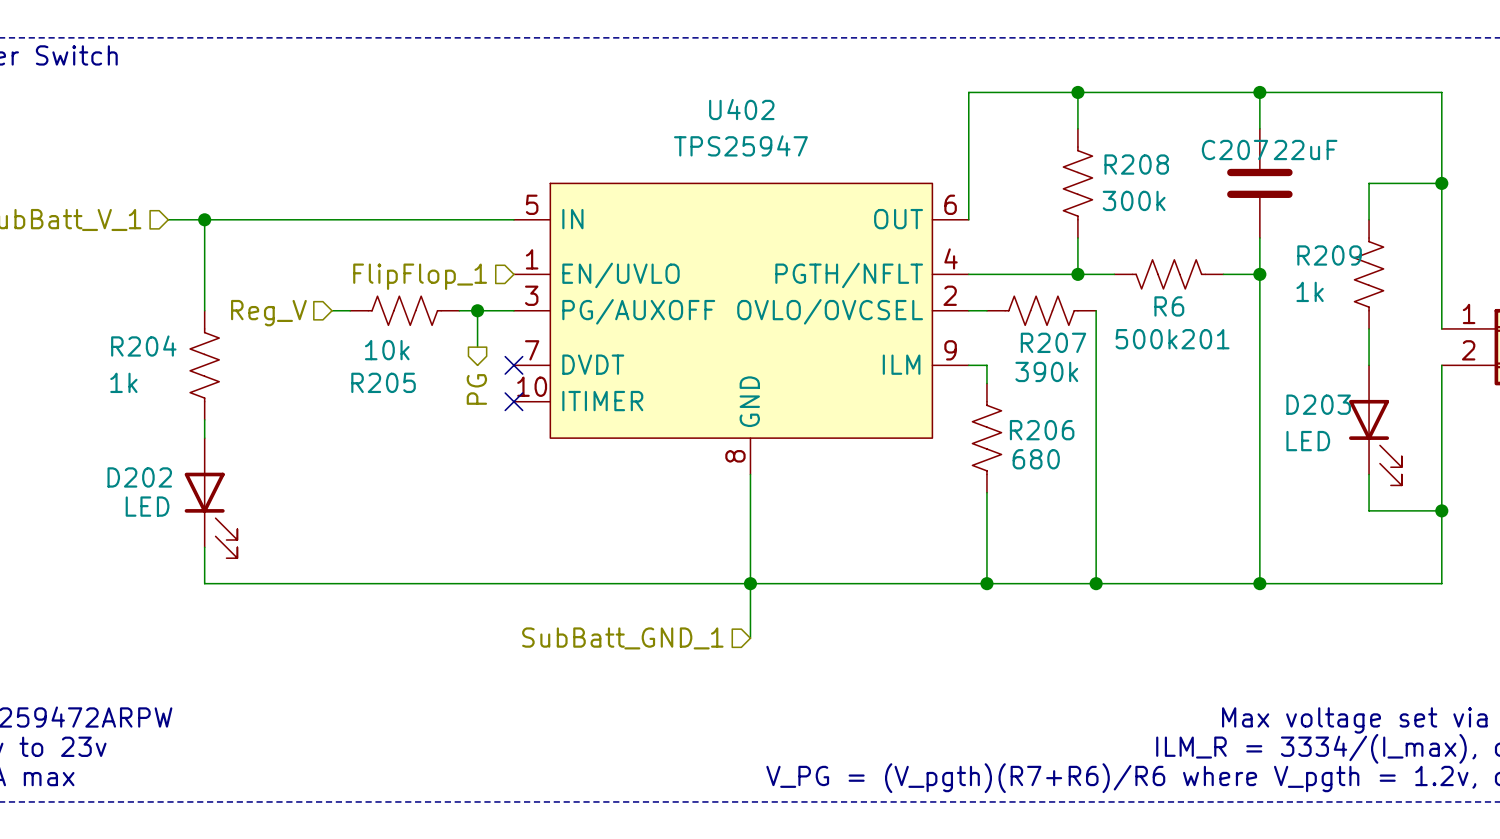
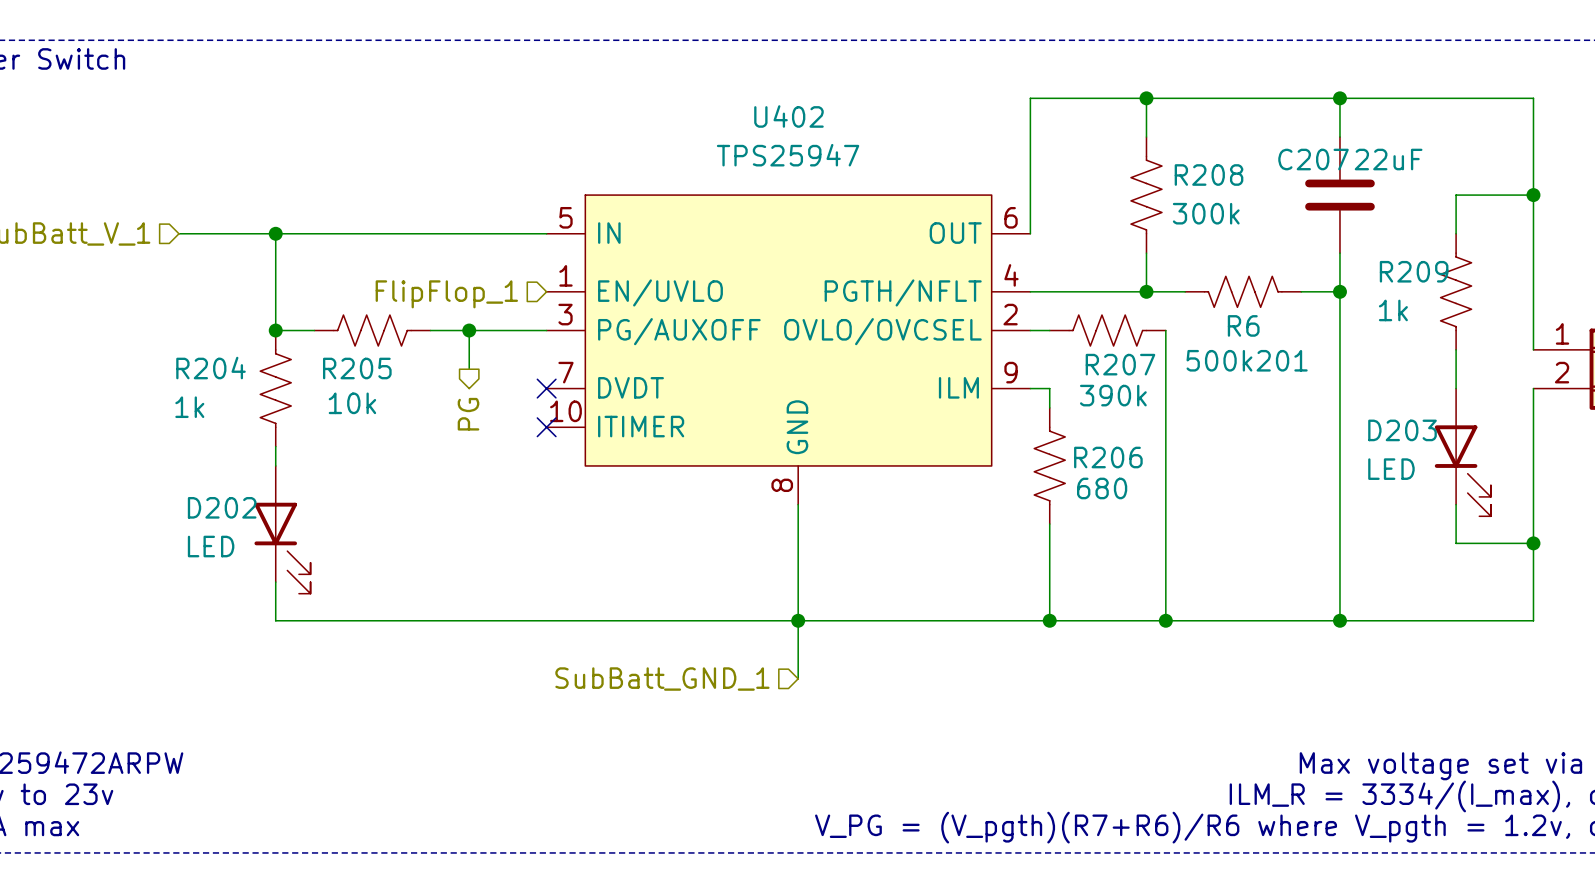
wire: (204, 219) (204, 310) -> none
junction: (204, 219) -> none
wire: none -> (275, 233) (275, 330) (314, 330)
junction: none -> (275, 233)
junction: none -> (275, 330)
wire: (332, 310) (350, 310) -> none
wire: none -> (430, 330) (488, 330)
R205 position: (404, 310) -> (372, 330)
wire: (477, 310) (477, 347) -> (469, 330) (469, 369)
junction position: (477, 310) -> (469, 330)
hierarchical label: Reg_V (268, 313) -> none
R205 value position: 10k (387, 350) -> 10k (352, 403)
R204 position: (204, 365) -> (275, 388)
R205 name position: R205 (383, 382) -> R205 (357, 368)
hierarchical label position: PG (476, 389) -> PG (468, 414)
wire: (204, 419) (204, 438) -> (275, 446) (275, 465)
D202 name position: D202 (139, 477) -> D202 (222, 507)
D202 position: (211, 498) -> (282, 529)
D202 value position: LED (147, 506) -> LED (211, 546)
wire: (204, 547) (204, 583) (259, 583) -> (275, 582) (275, 620)

